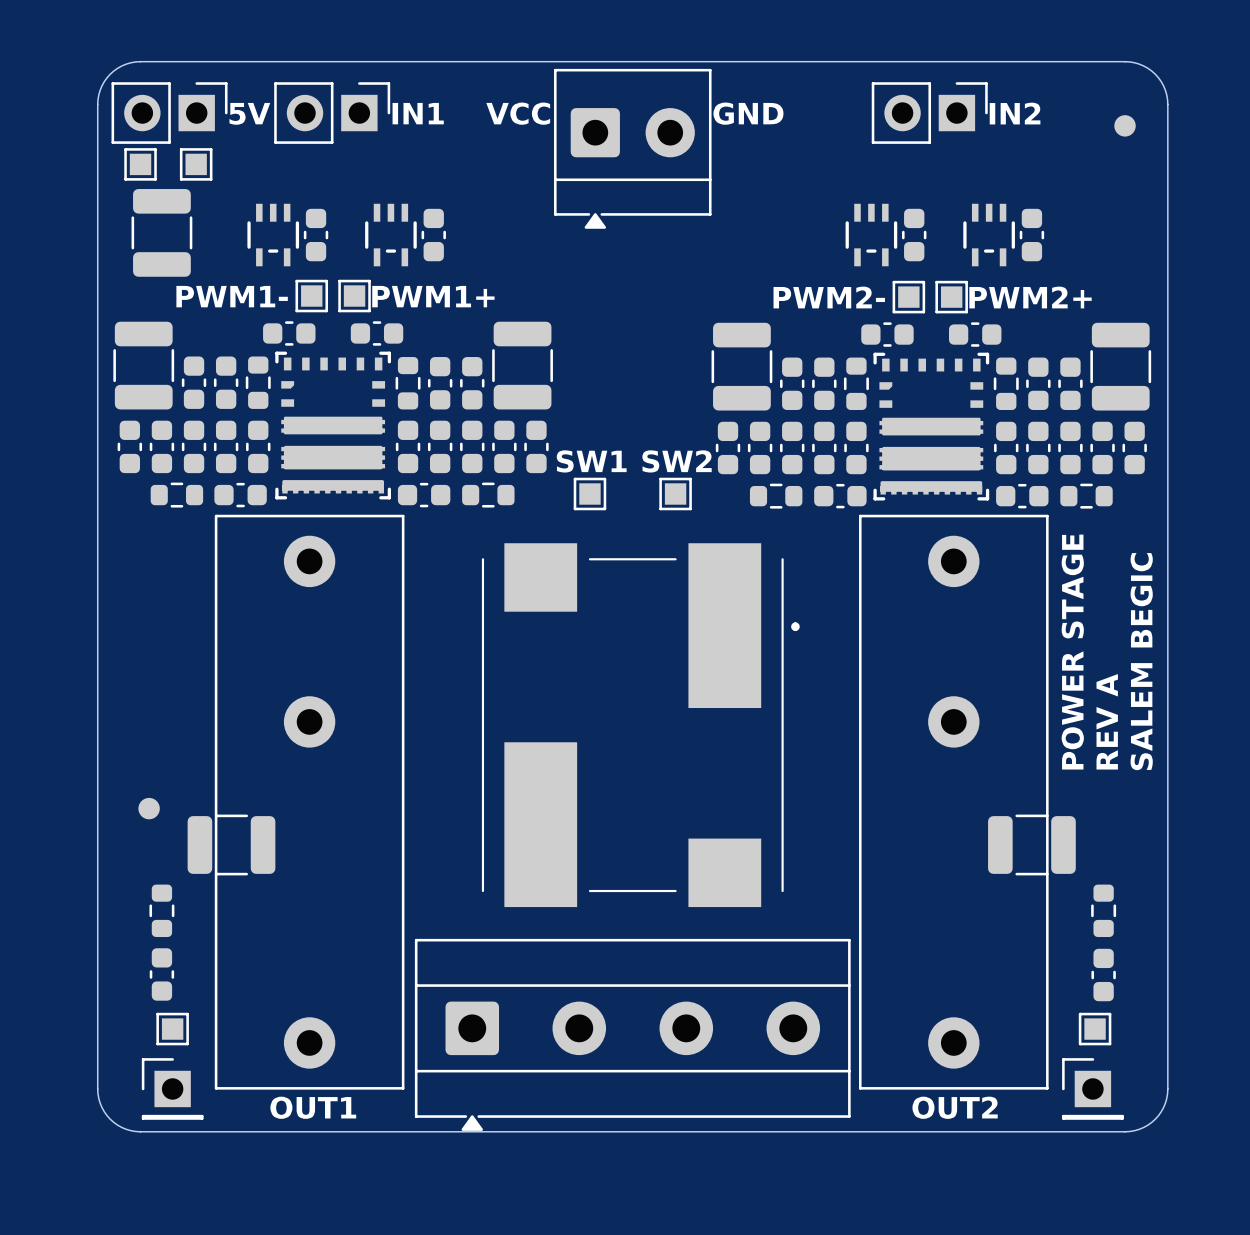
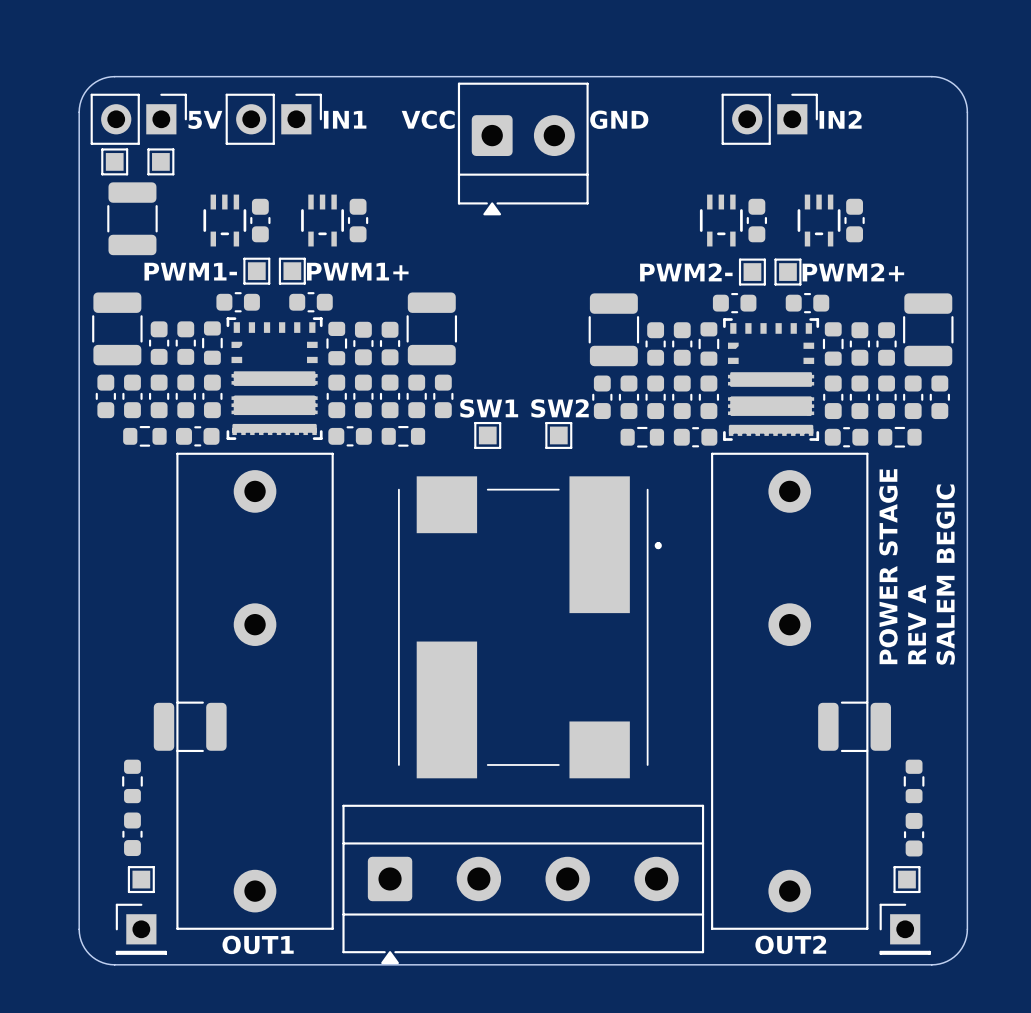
part: (1125, 125) -> none
part: (149, 808) -> none

